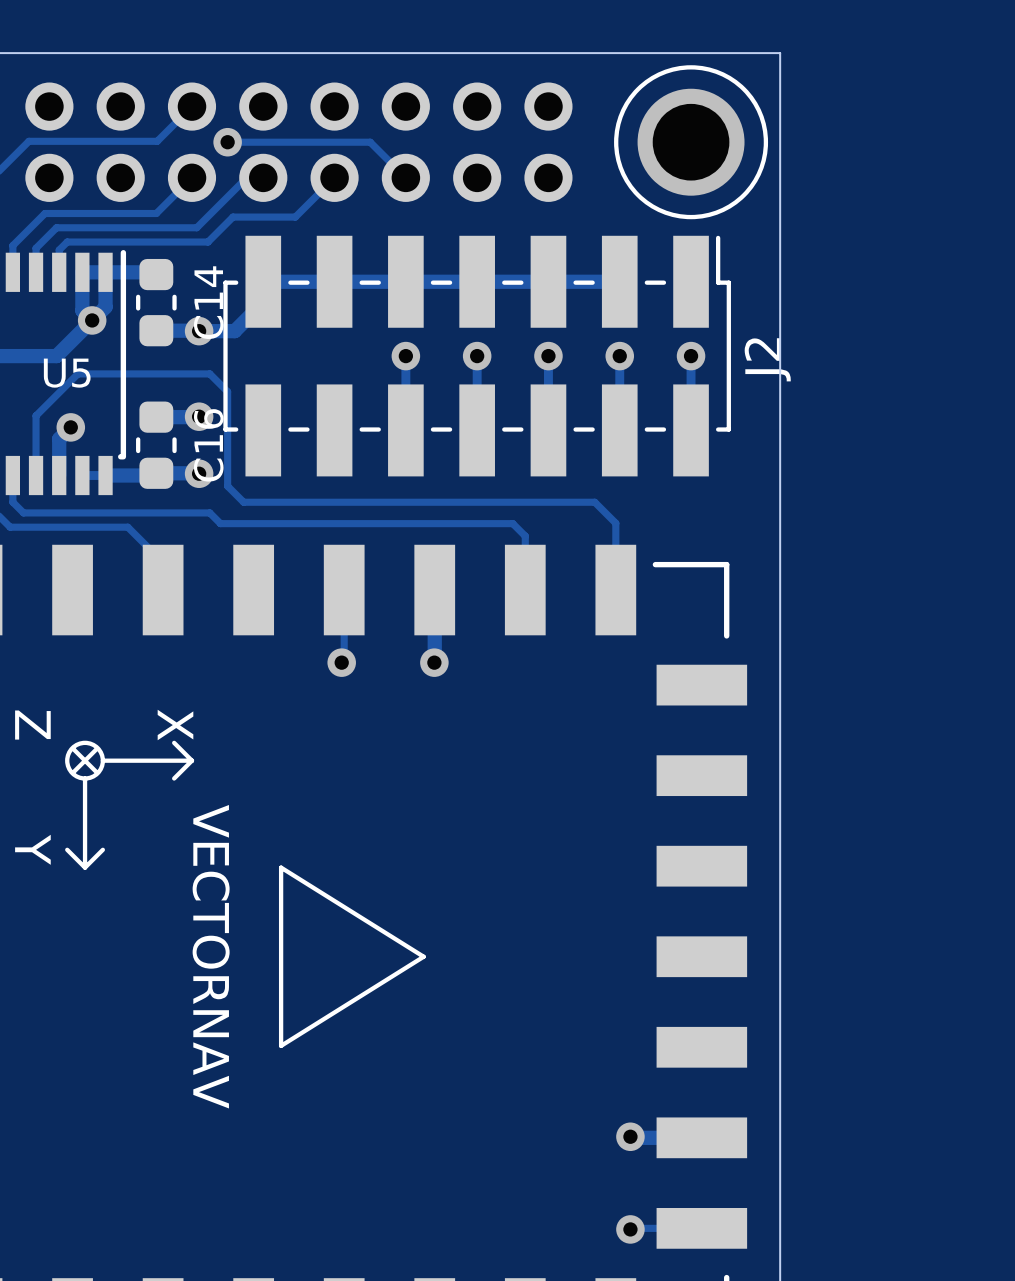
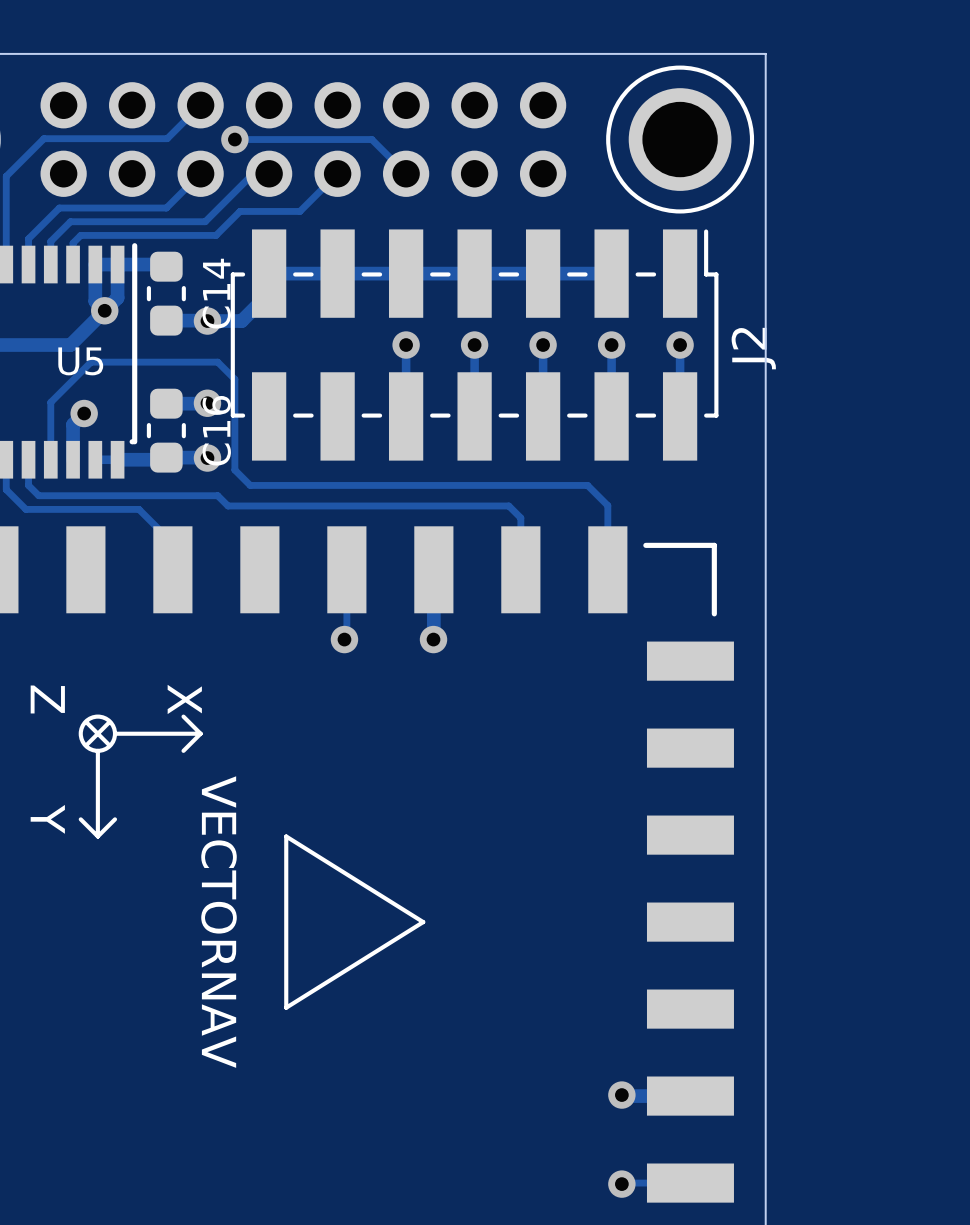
via: (691, 142) -> none
part: none -> (680, 139)

